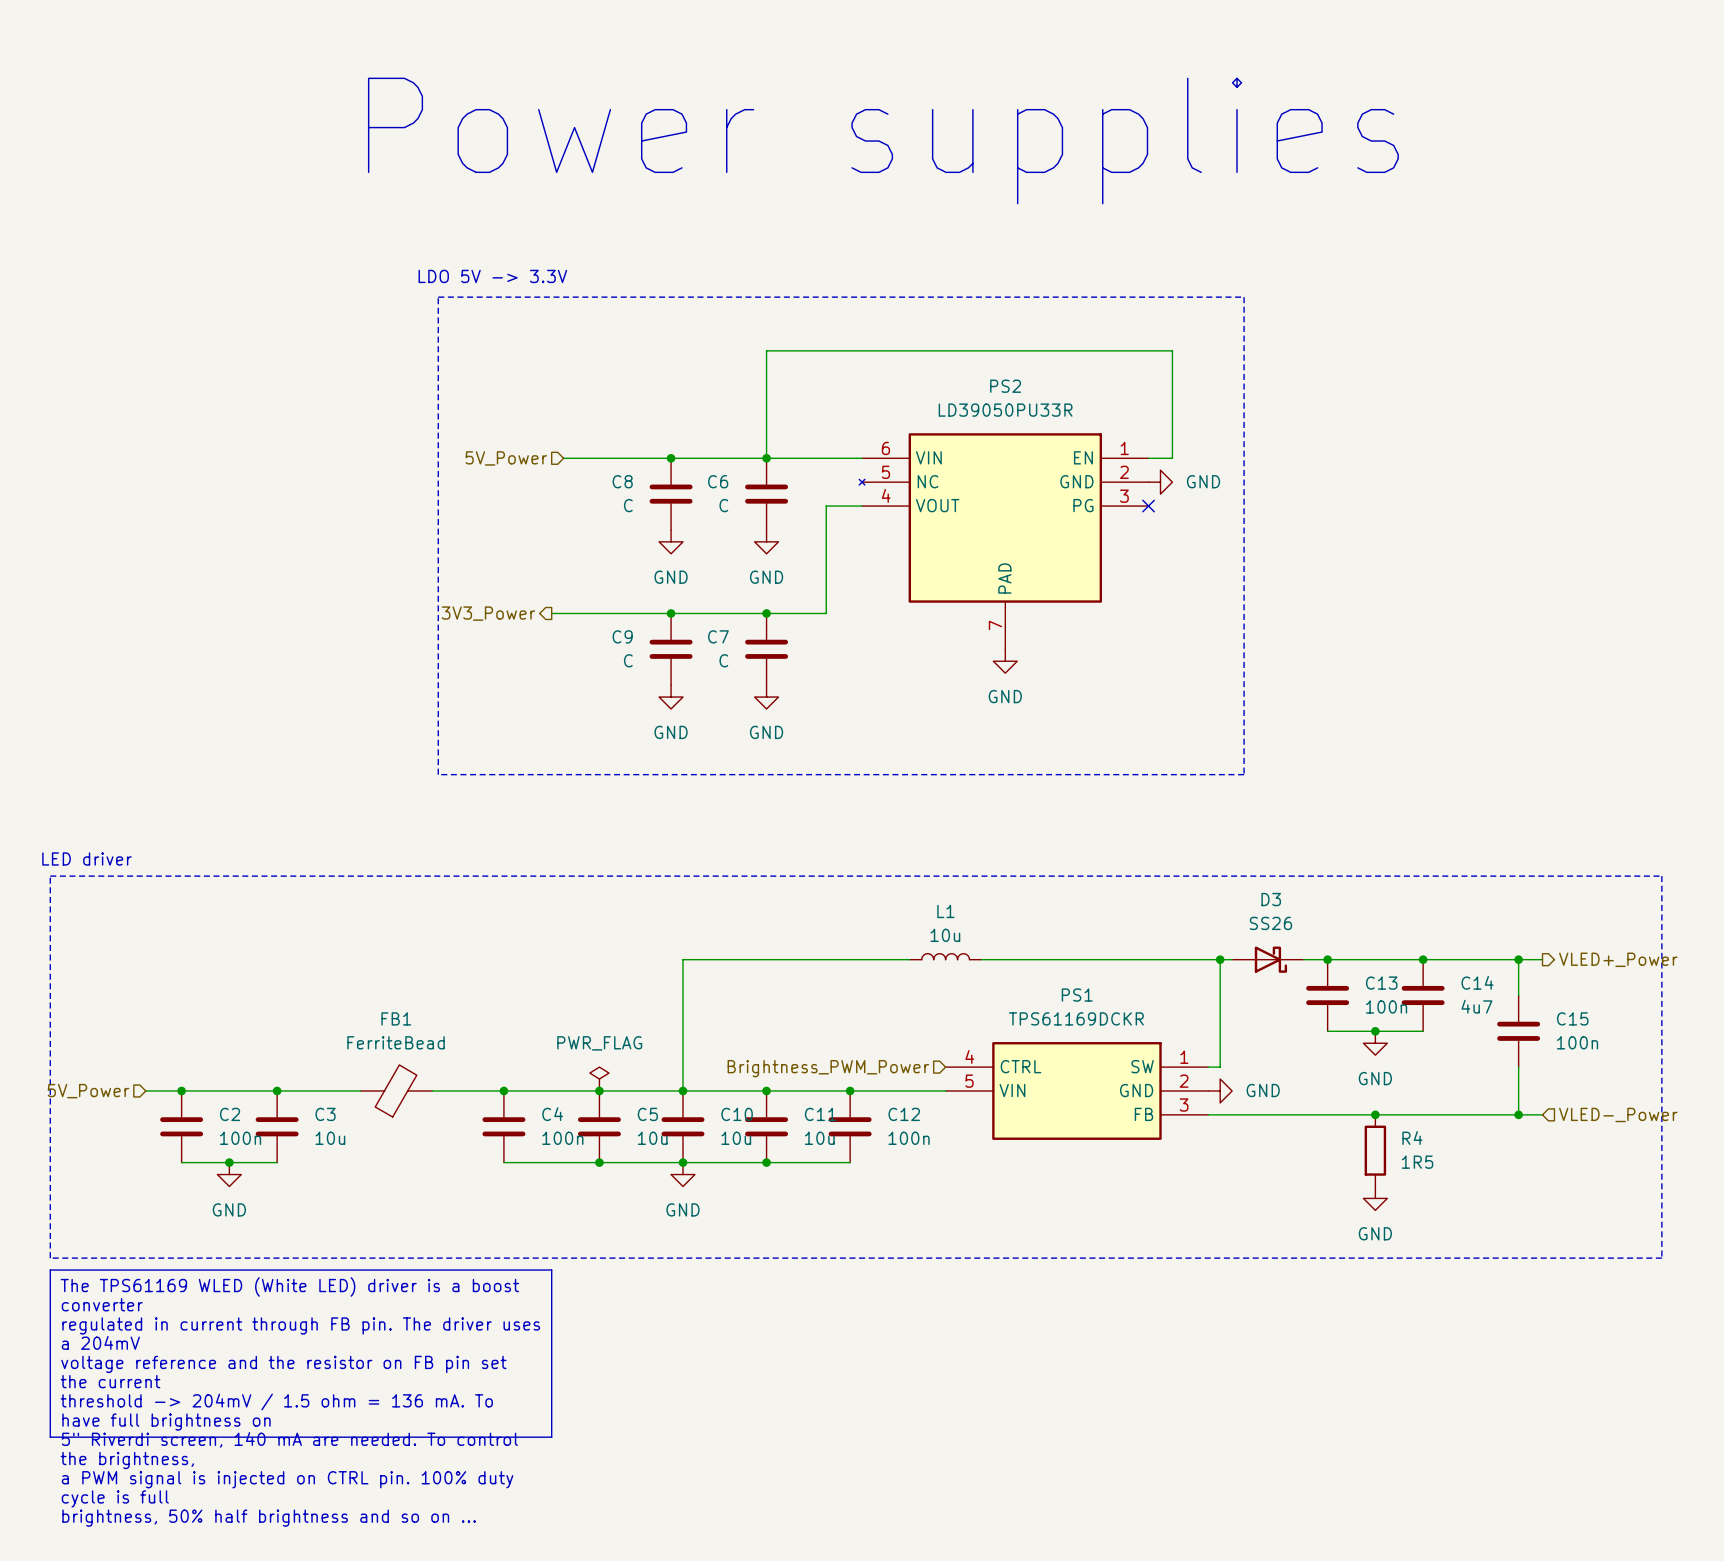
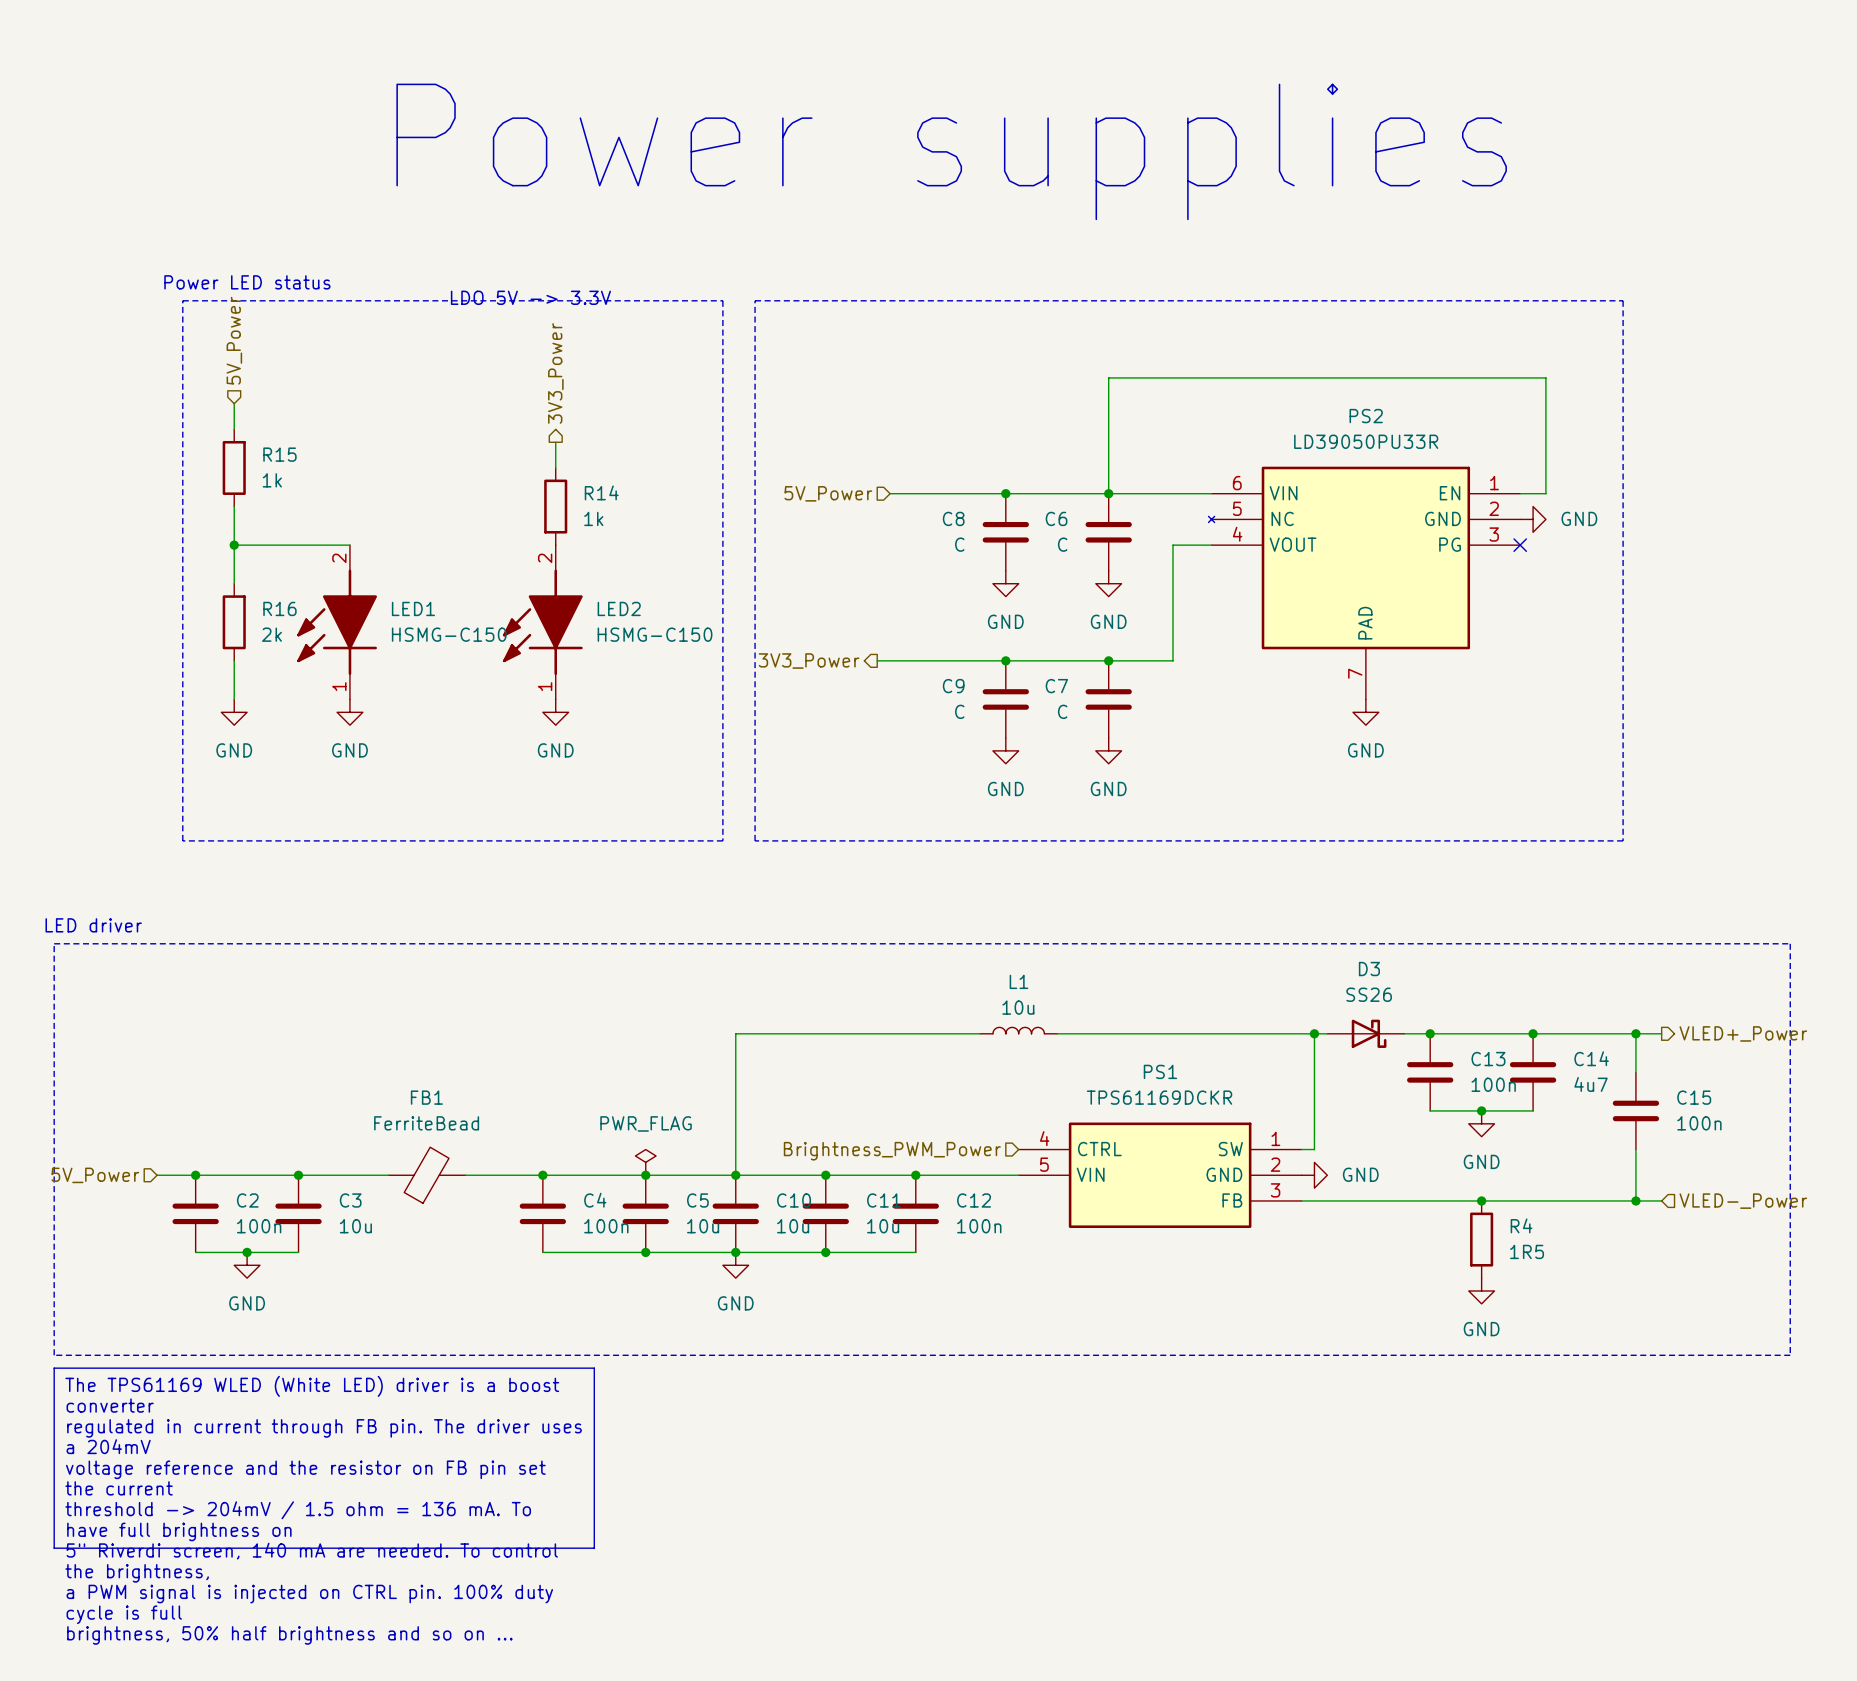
text: none -> Power LED status (247, 282)
line: none -> (182, 300) (722, 300) (722, 840) (182, 840) (182, 300)
line: none -> (755, 300) (1623, 300) (1623, 840) (755, 840) (755, 300)
line: (438, 297) (1244, 297) (1244, 774) (438, 774) (438, 297) -> none
hierarchical label: none -> 5V_Power (234, 340)
hierarchical label: none -> 3V3_Power (555, 373)
wire: (1029, 350) (766, 350) (766, 458) -> (1108, 377) (1108, 493)
wire: (1172, 350) (1172, 458) (1148, 458) -> (1263, 377) (1545, 377) (1545, 493) (1520, 493)
wire: none -> (234, 403) (234, 429)
wire: none -> (555, 442) (555, 467)
R15: none -> 1k (234, 467)
hierarchical label: 5V_Power (506, 458) -> none
wire: (563, 458) (826, 458) -> none
junction: (671, 458) -> none
junction: (766, 458) -> none
hierarchical label: none -> 5V_Power (828, 493)
junction: none -> (1005, 493)
junction: none -> (1108, 493)
wire: none -> (234, 506) (234, 583)
R14: none -> 1k (555, 506)
power symbol: GND (1160, 482) -> none
power symbol: none -> GND (1533, 519)
C8 position: (671, 494) -> (1005, 532)
C6 position: (766, 494) -> (1108, 532)
wire: none -> (234, 545) (349, 545)
junction: none -> (234, 545)
wire: (862, 506) (826, 506) (826, 613) -> (1211, 545) (1172, 545) (1172, 660) (890, 660)
no-connect mark: (1148, 506) -> none
no-connect mark: none -> (1520, 545)
power symbol: GND (671, 541) -> none
power symbol: GND (766, 541) -> none
power symbol: none -> GND (1005, 583)
PS2 position: (1003, 541) -> (1364, 583)
power symbol: none -> GND (1108, 583)
R16: none -> 2k (234, 622)
LED1: none -> HSMG-C150 (337, 622)
LED2: none -> HSMG-C150 (542, 622)
wire: none -> (234, 660) (234, 699)
hierarchical label: 3V3_Power (488, 613) -> none
wire: (551, 613) (814, 613) -> none
junction: (671, 613) -> none
hierarchical label: none -> 3V3_Power (809, 661)
junction: (766, 613) -> none
junction: none -> (1005, 660)
junction: none -> (1108, 660)
C9 position: (671, 649) -> (1005, 699)
C7 position: (766, 649) -> (1108, 699)
power symbol: none -> GND (234, 712)
power symbol: none -> GND (349, 712)
power symbol: none -> GND (555, 712)
power symbol: GND (1005, 661) -> none
power symbol: none -> GND (1365, 712)
power symbol: GND (671, 697) -> none
power symbol: GND (766, 697) -> none
power symbol: none -> GND (1005, 750)
power symbol: none -> GND (1108, 750)

